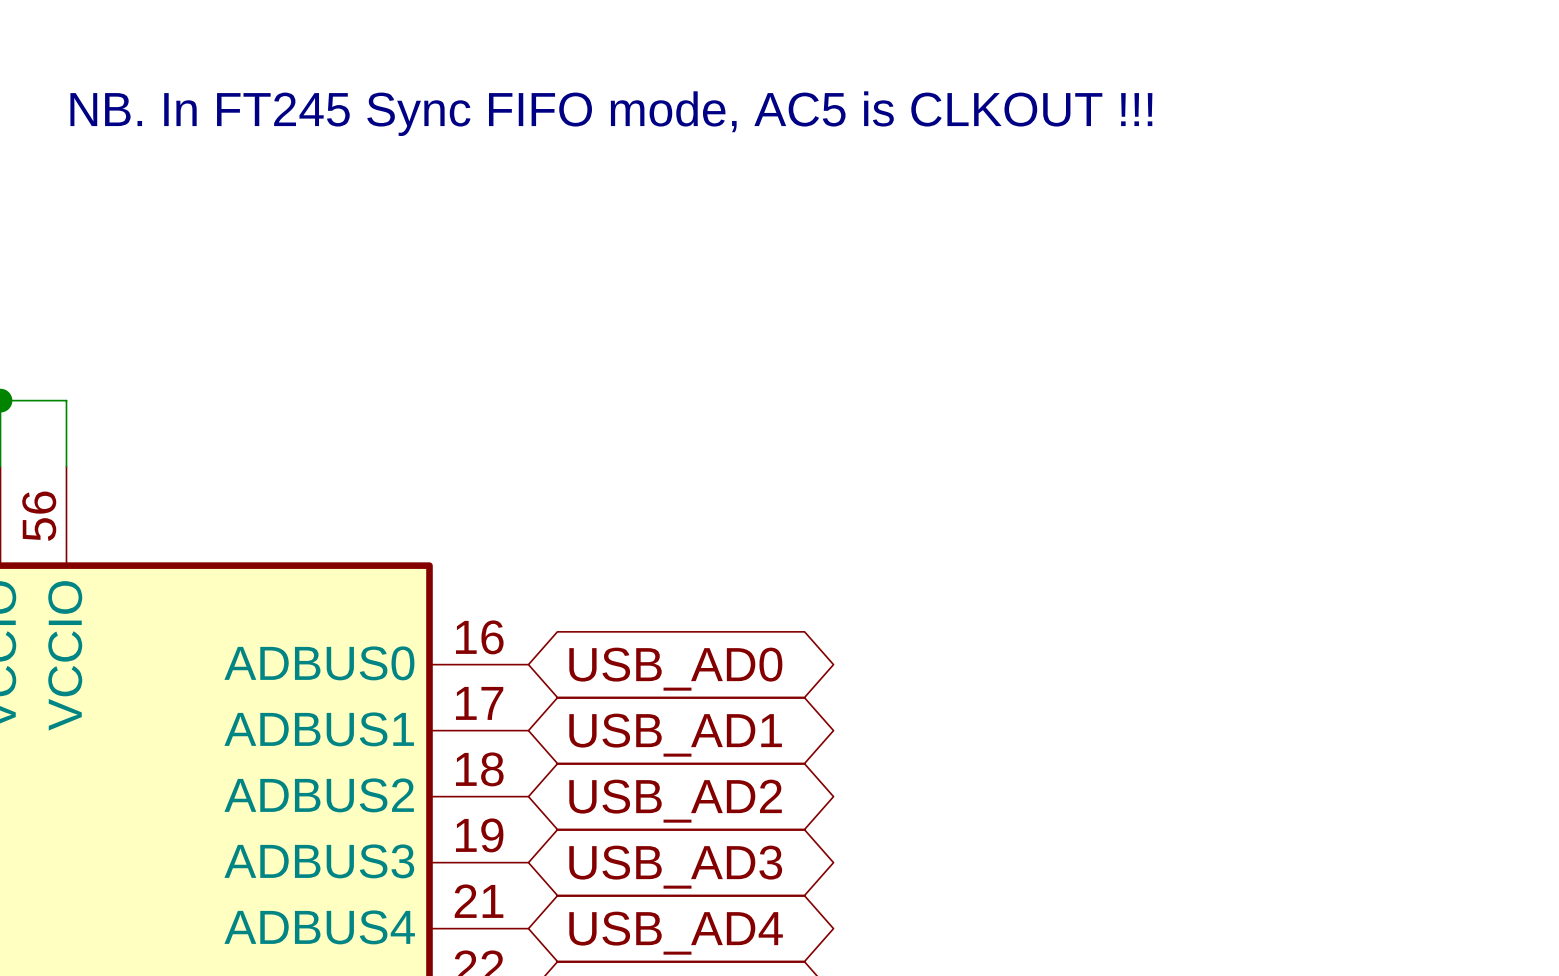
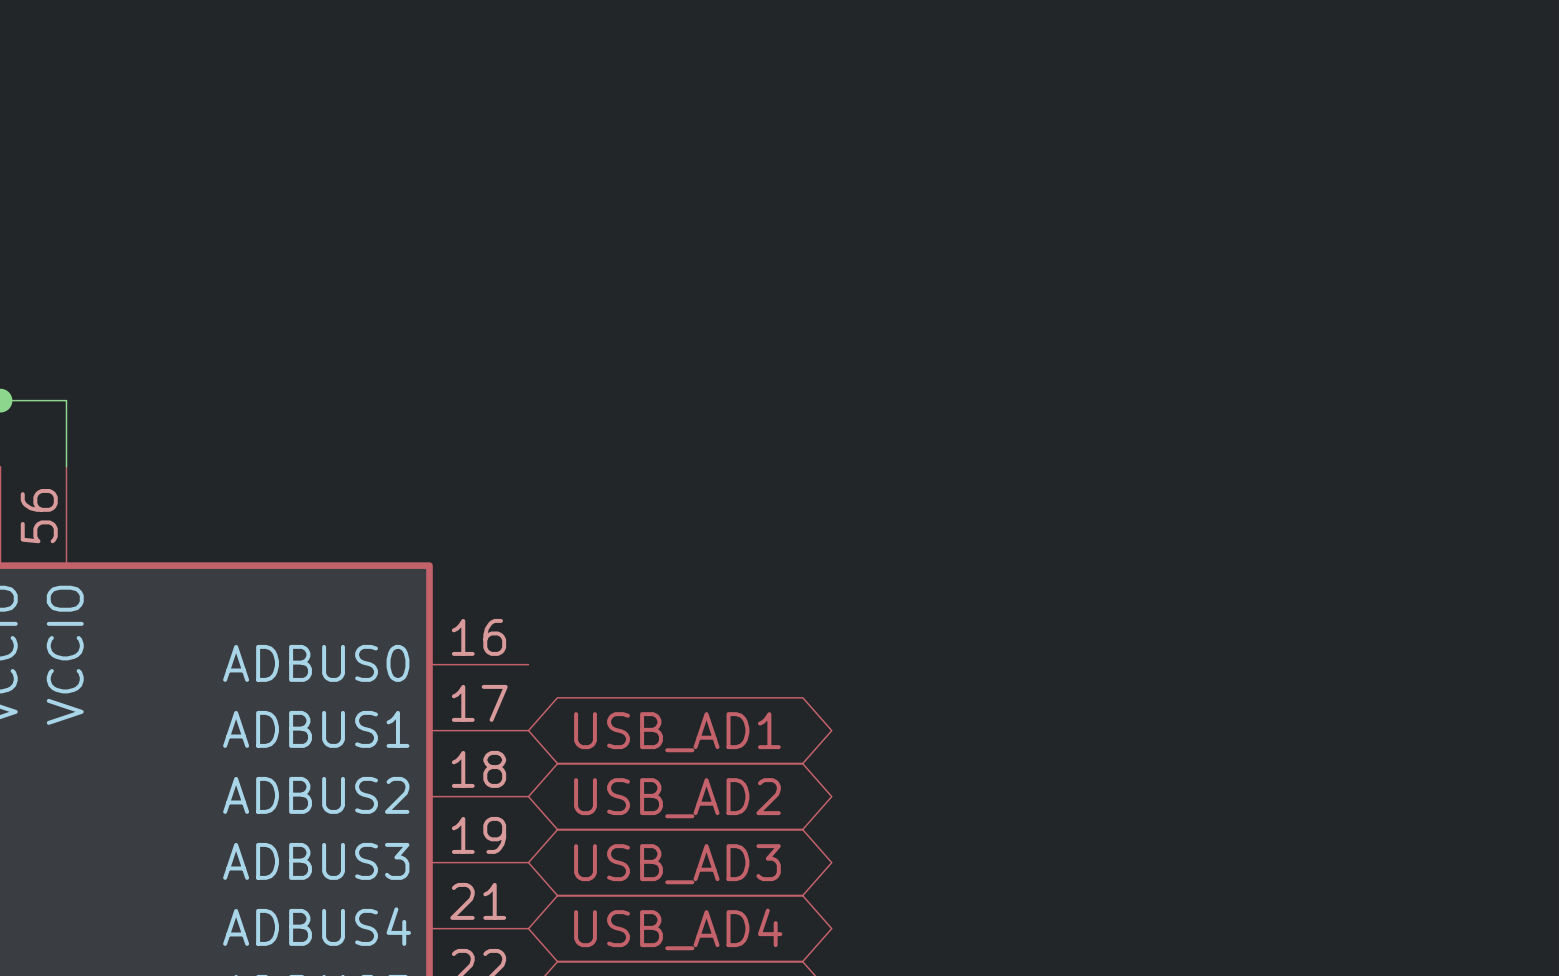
text: NB. In FT245 Sync FIFO mode, AC5 is CLKOUT !!! (611, 113) -> none
wire: (0, 400) (0, 466) -> none
global label: USB_AD0 (675, 669) -> none

